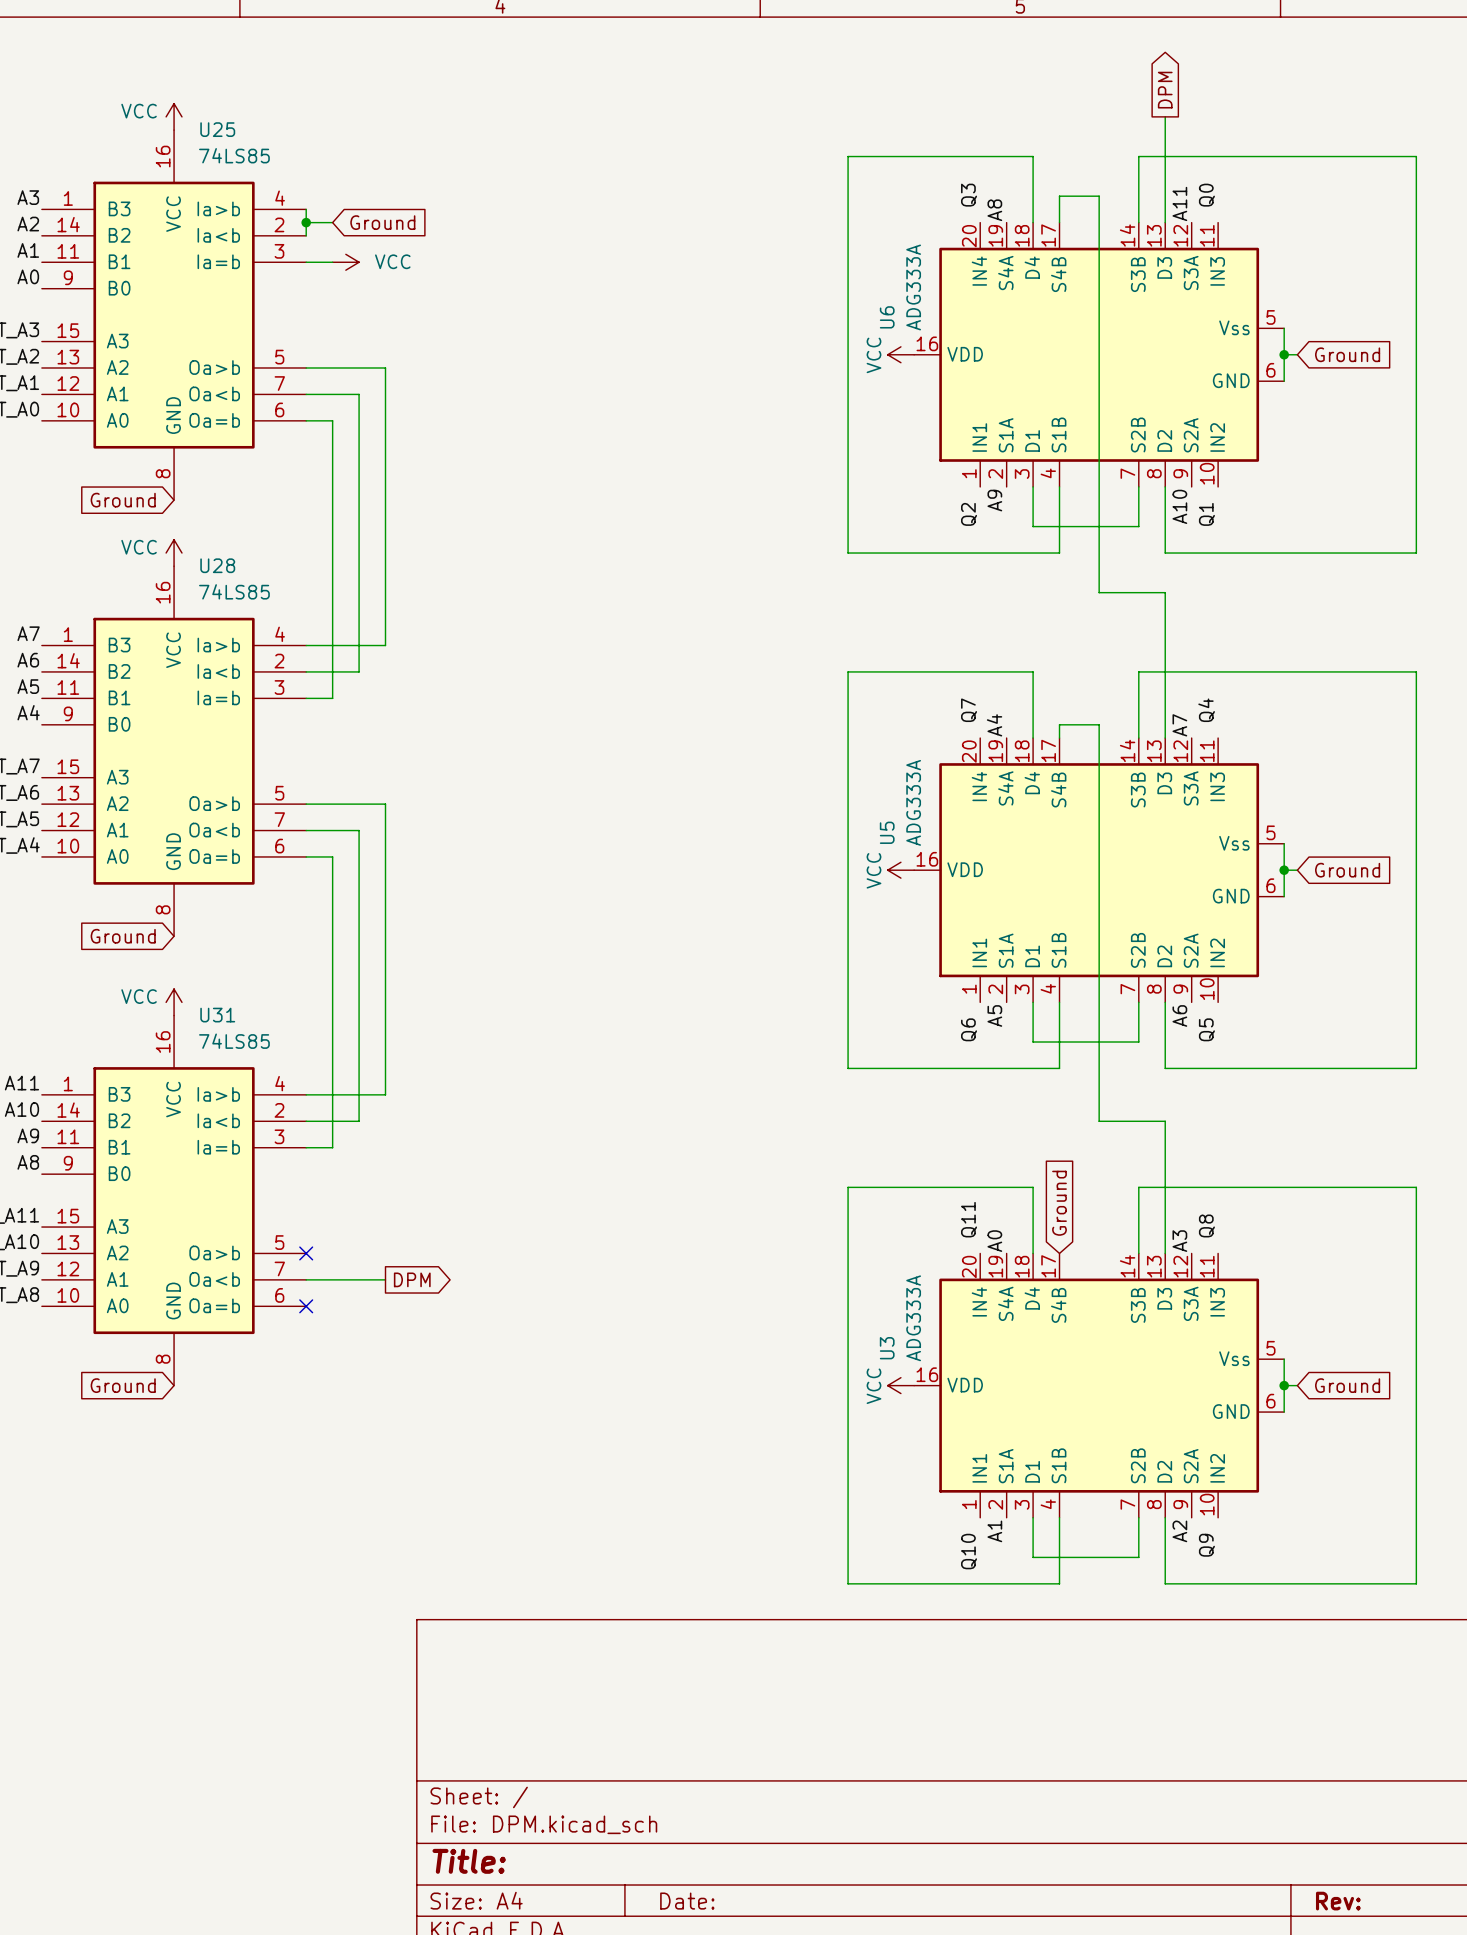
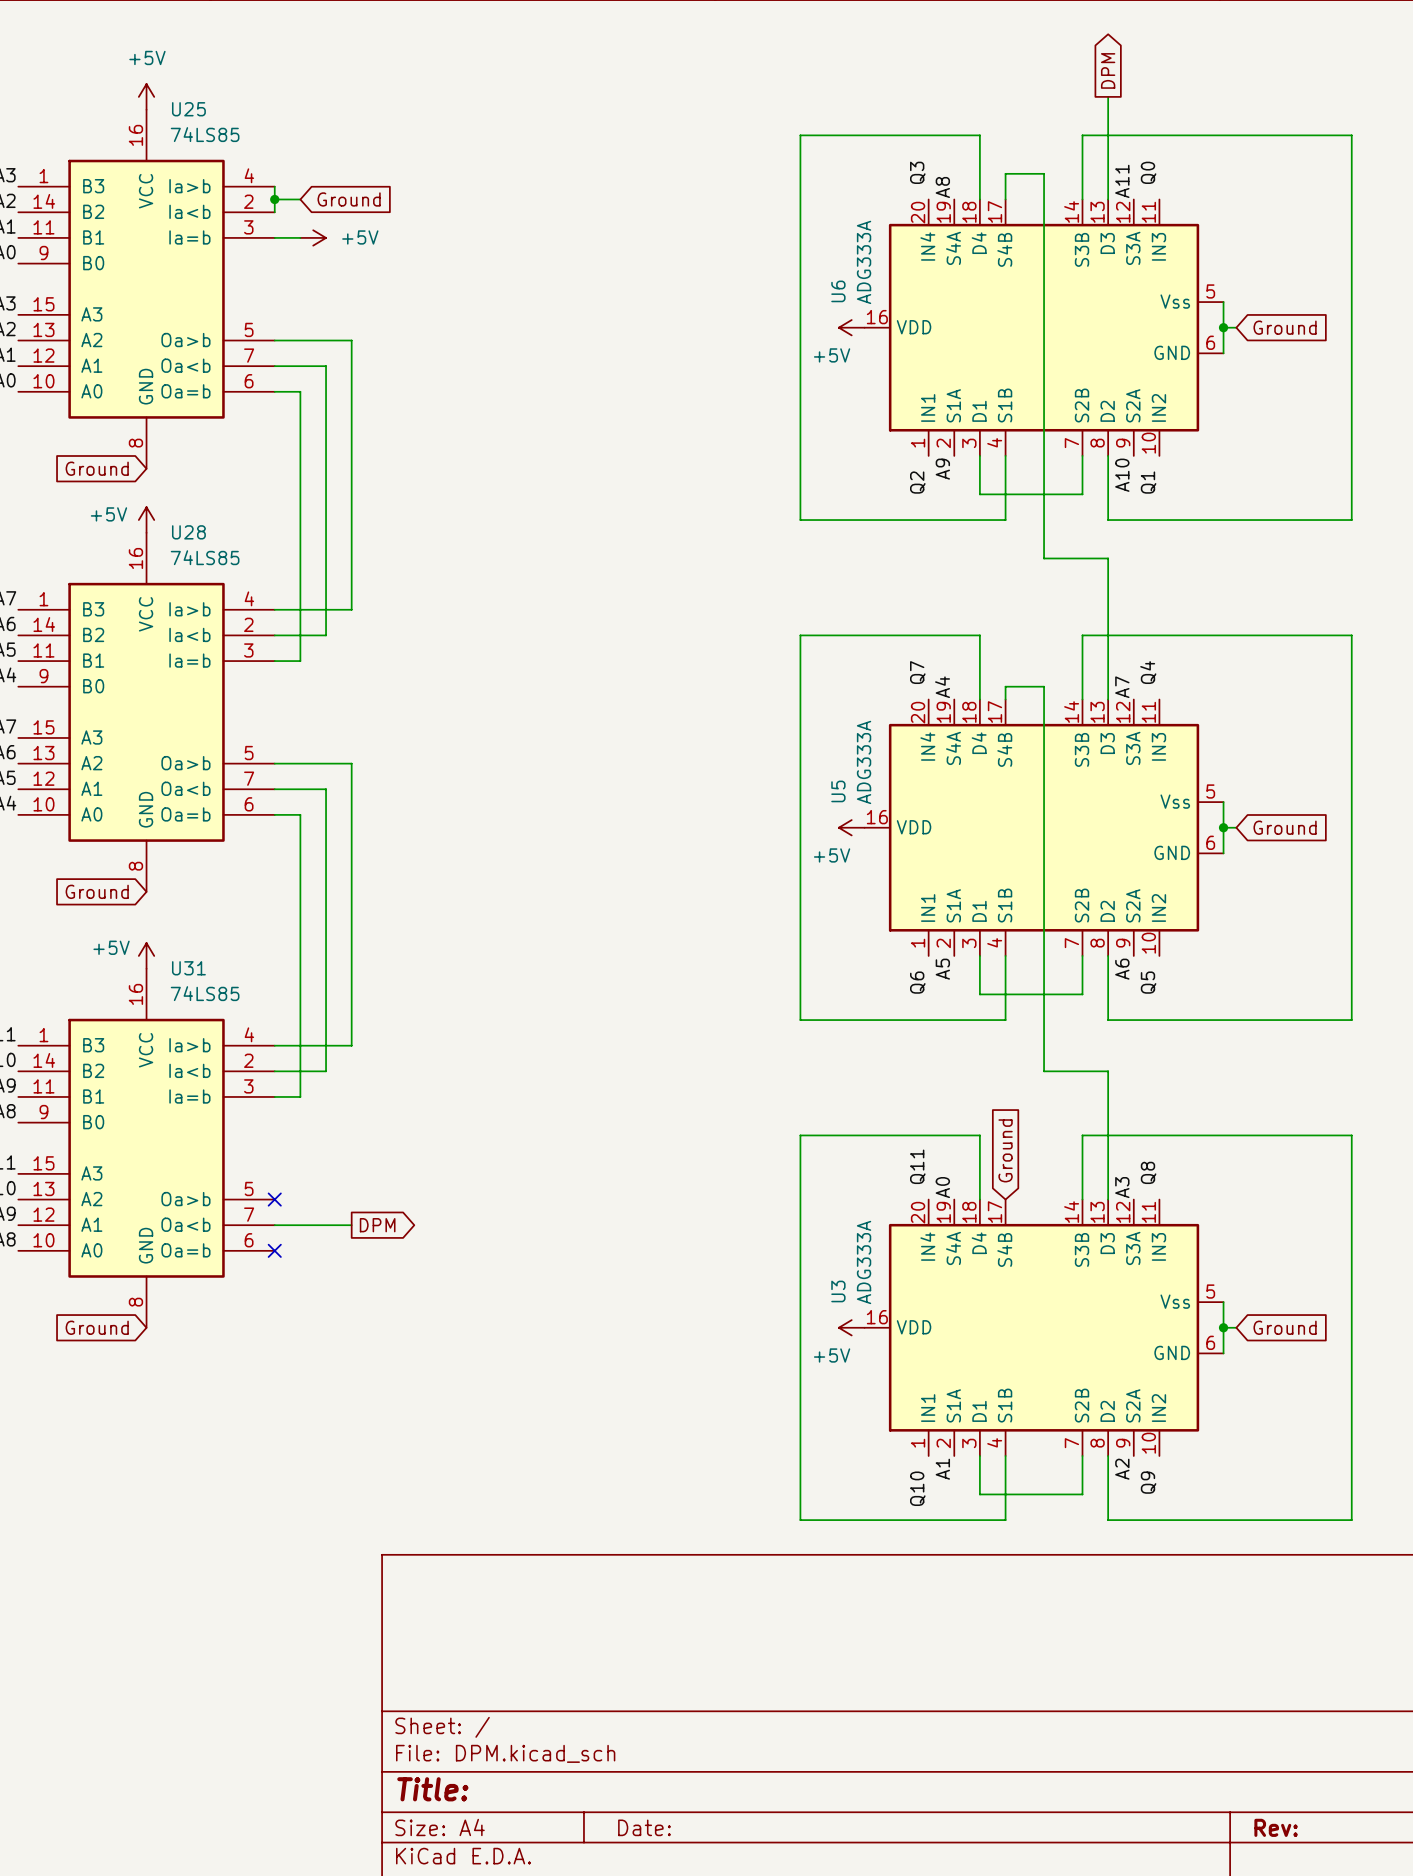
power symbol: VCC (174, 116) -> +5V (146, 96)
power symbol: VCC (345, 262) -> +5V (313, 237)
power symbol: VCC (900, 354) -> +5V (851, 327)
power symbol: VCC (174, 553) -> +5V (146, 520)
power symbol: VCC (900, 870) -> +5V (851, 827)
power symbol: VCC (174, 1002) -> +5V (146, 955)
power symbol: VCC (900, 1385) -> +5V (851, 1327)

